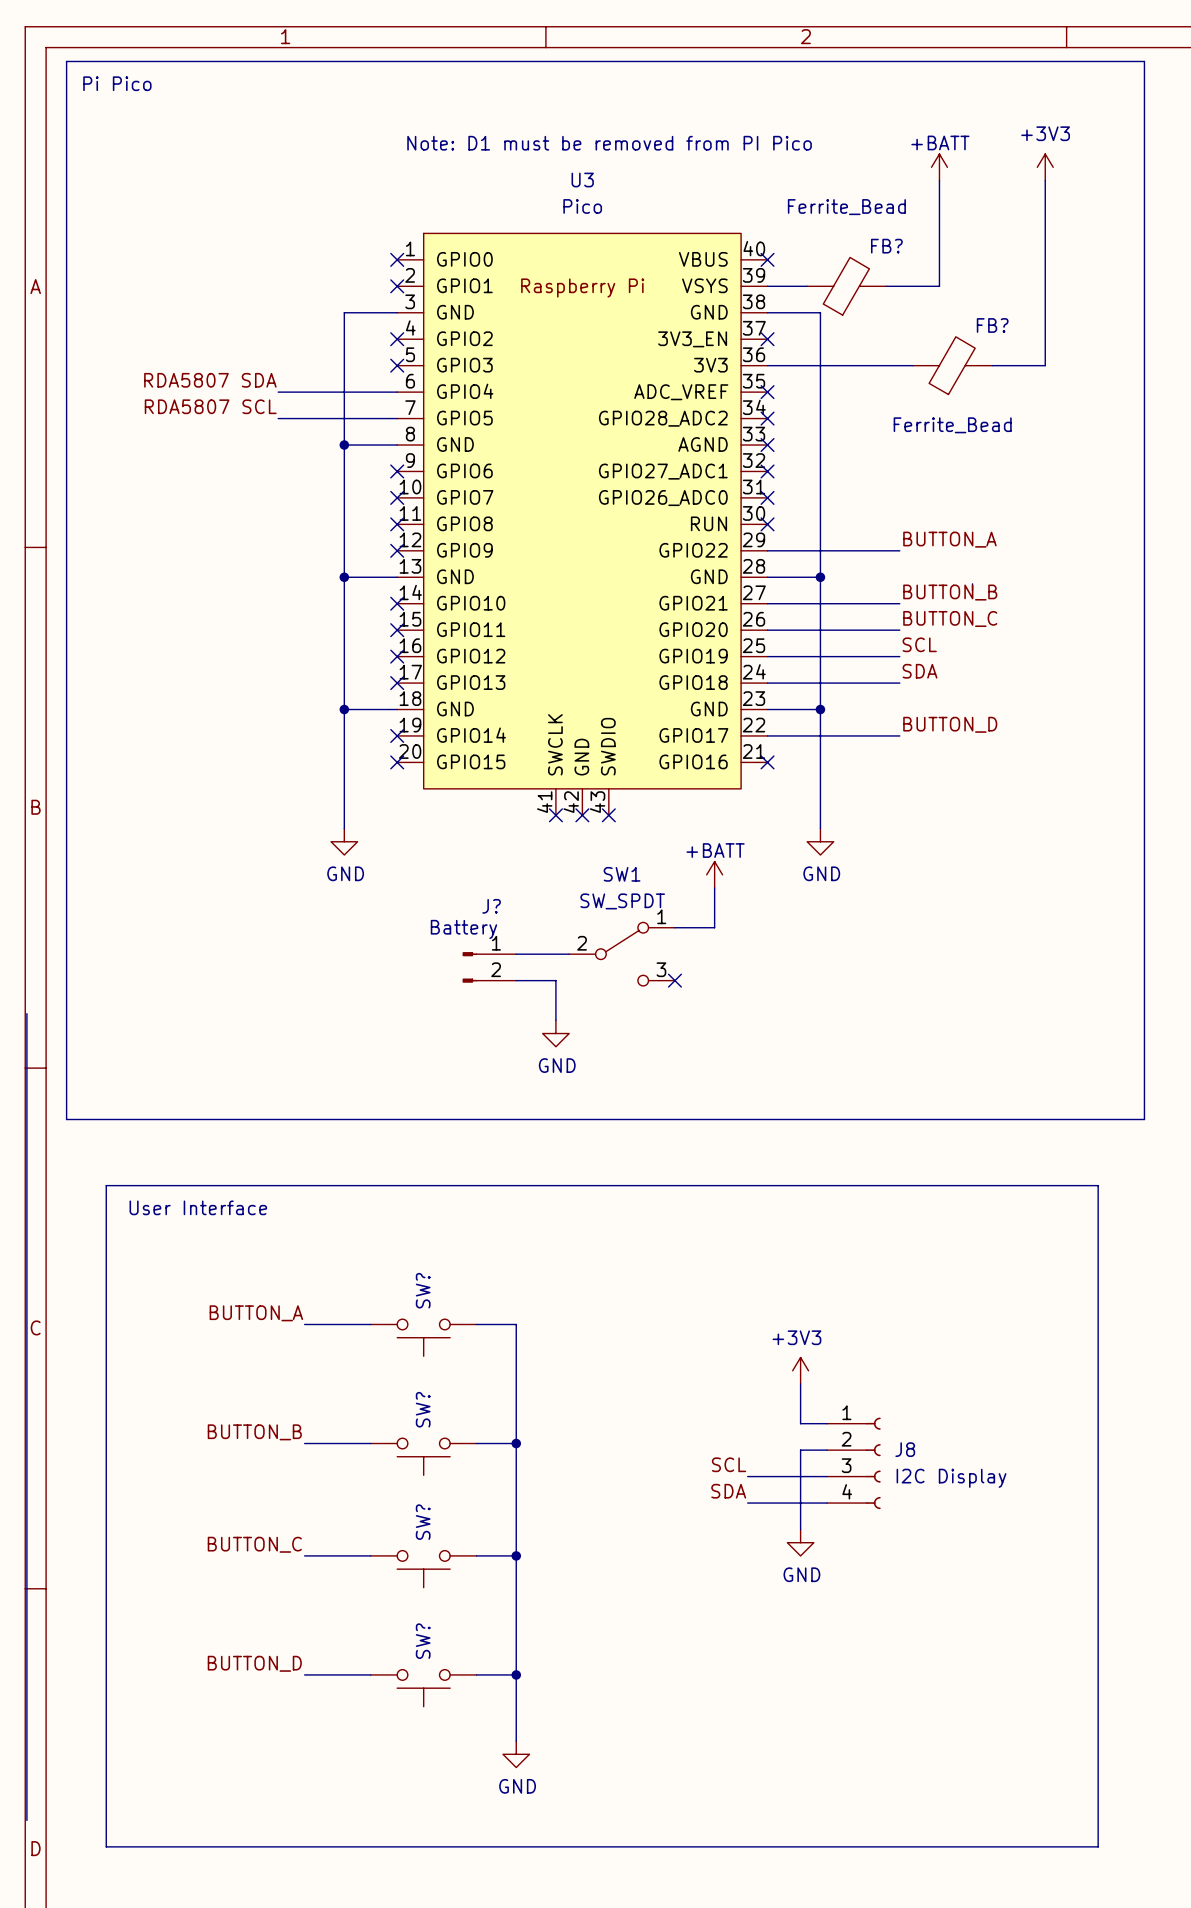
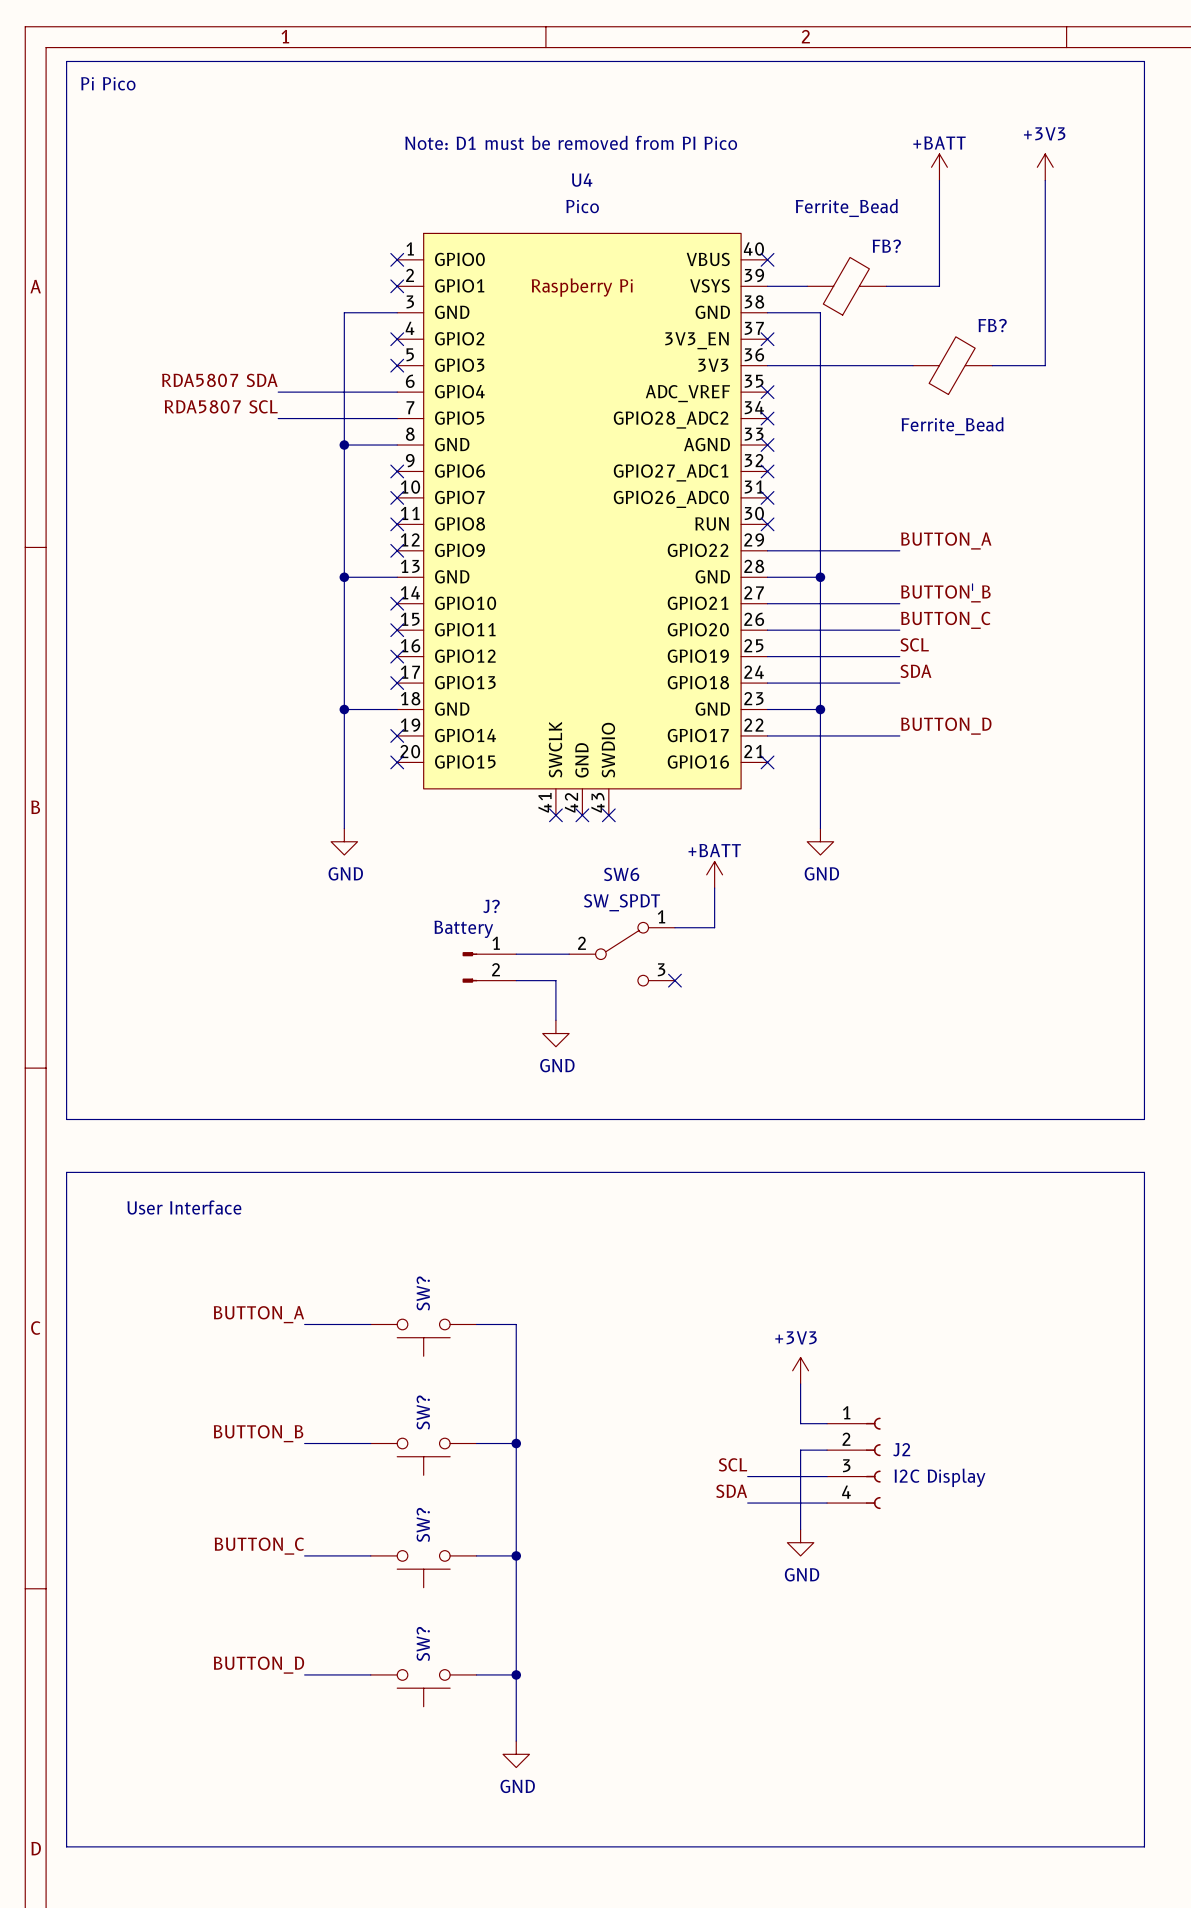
U3 name: U3 (582, 180) -> U4 (582, 180)
SW1 name: SW1 (622, 874) -> SW6 (621, 874)
wire: (26, 1013) (26, 1820) -> none
J8 name: J8 (905, 1449) -> J2 (901, 1449)
line: (106, 1846) (106, 1185) (1098, 1185) (1098, 1846) -> (106, 1846) (66, 1846) (66, 1172) (1144, 1172) (1144, 1846) (1098, 1846)

